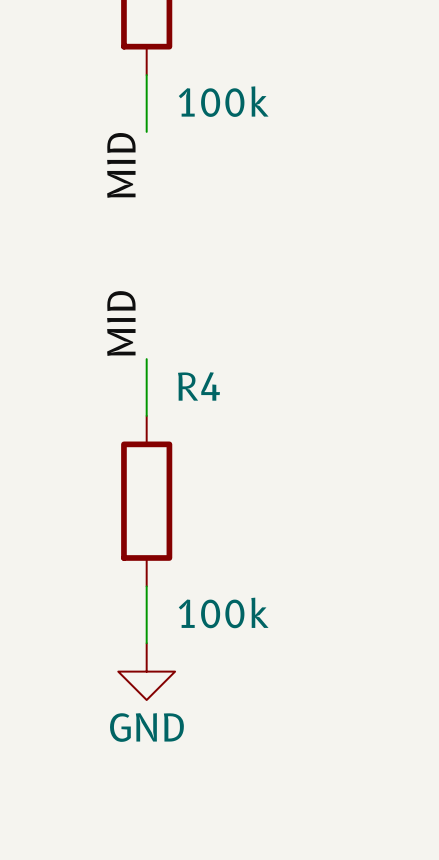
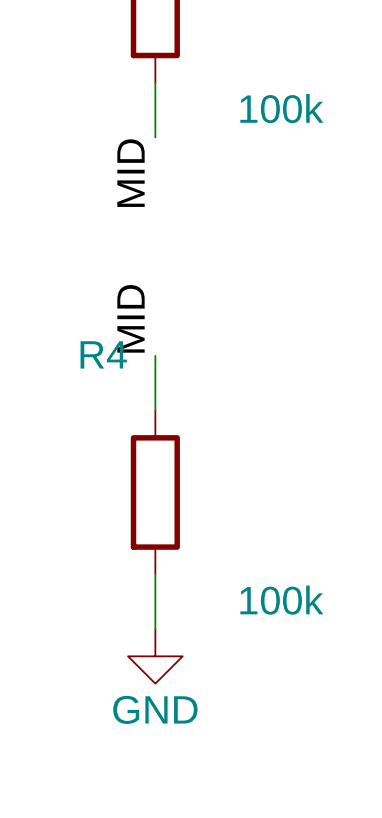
part value position: 100k (223, 101) -> 100k (281, 108)
R4 name position: R4 (198, 386) -> R4 (103, 354)
R4 value position: 100k (223, 612) -> 100k (281, 600)

